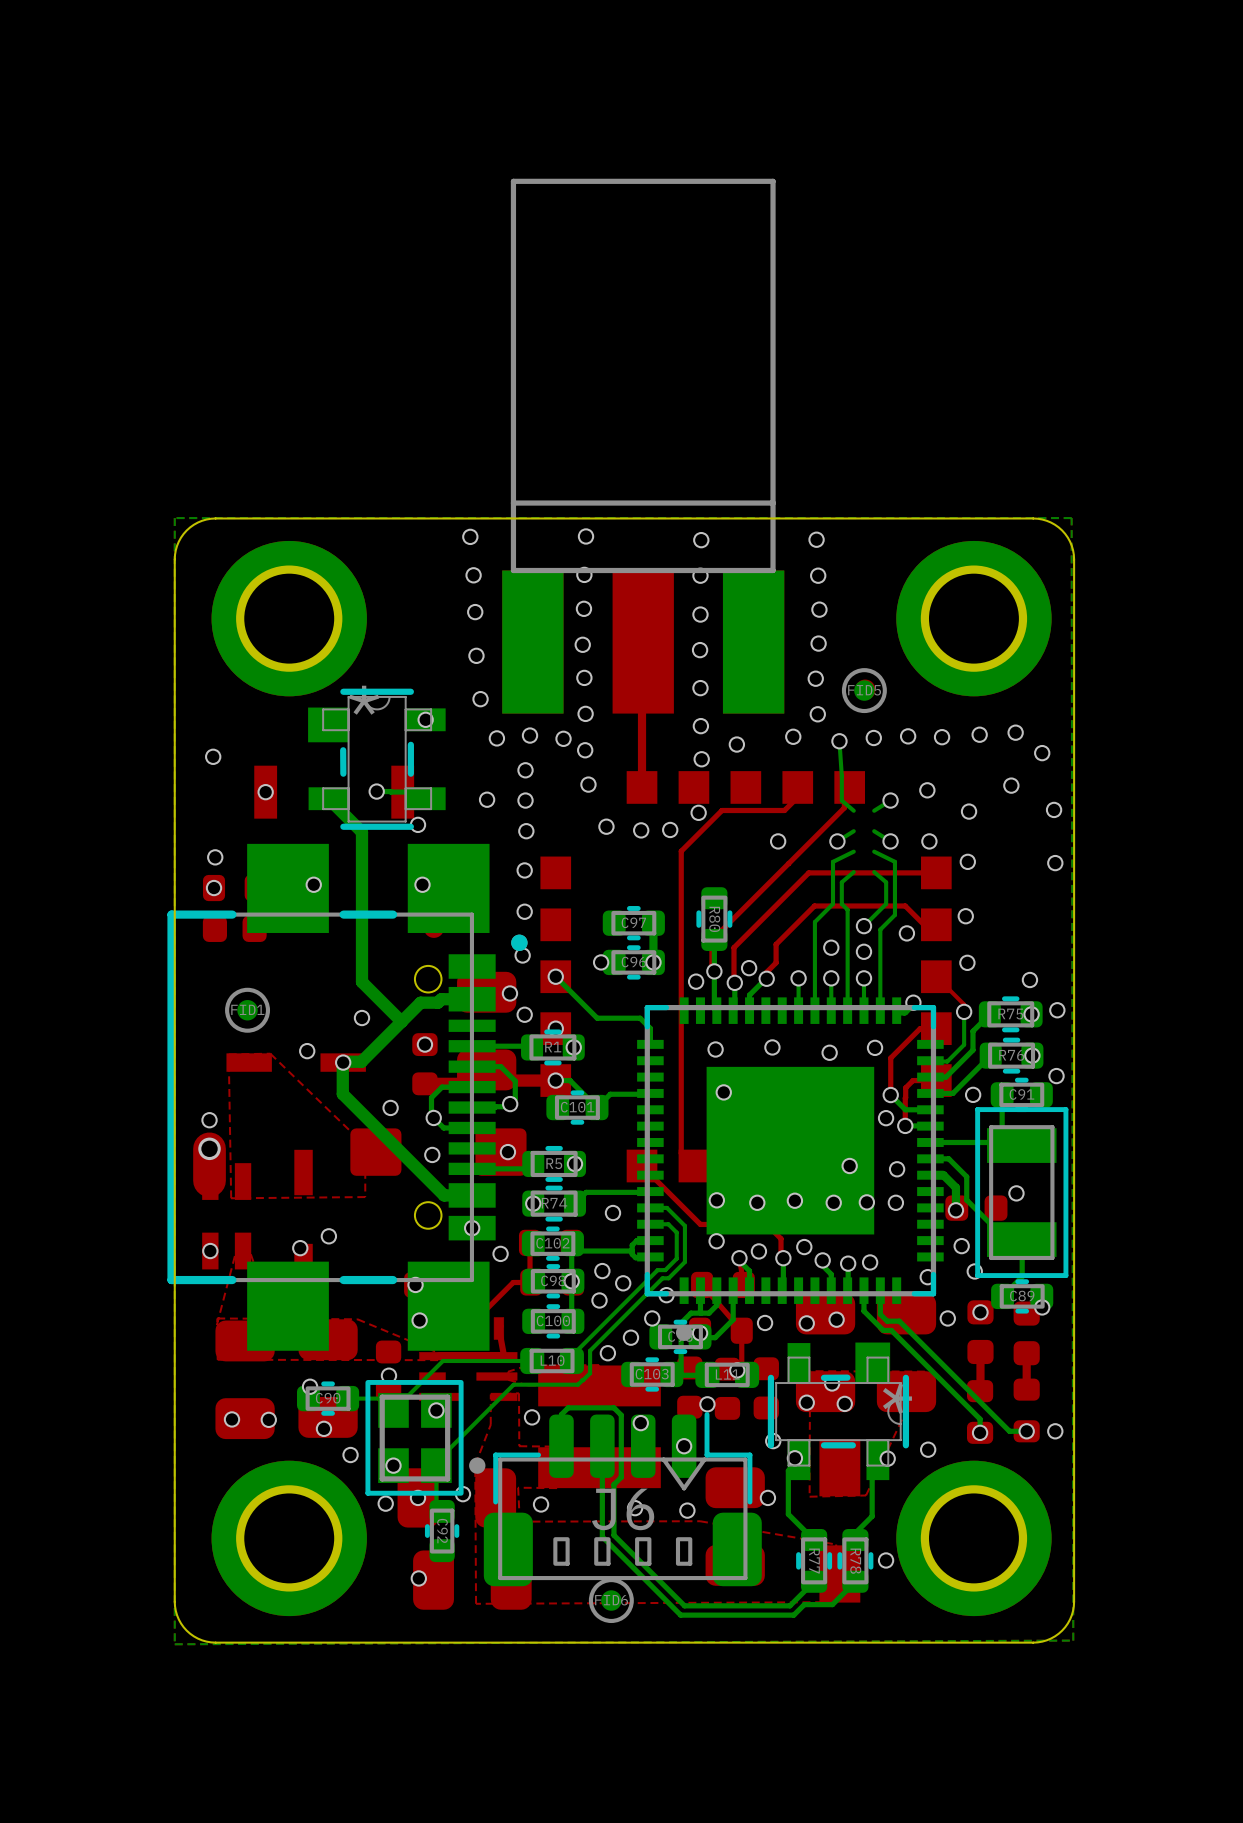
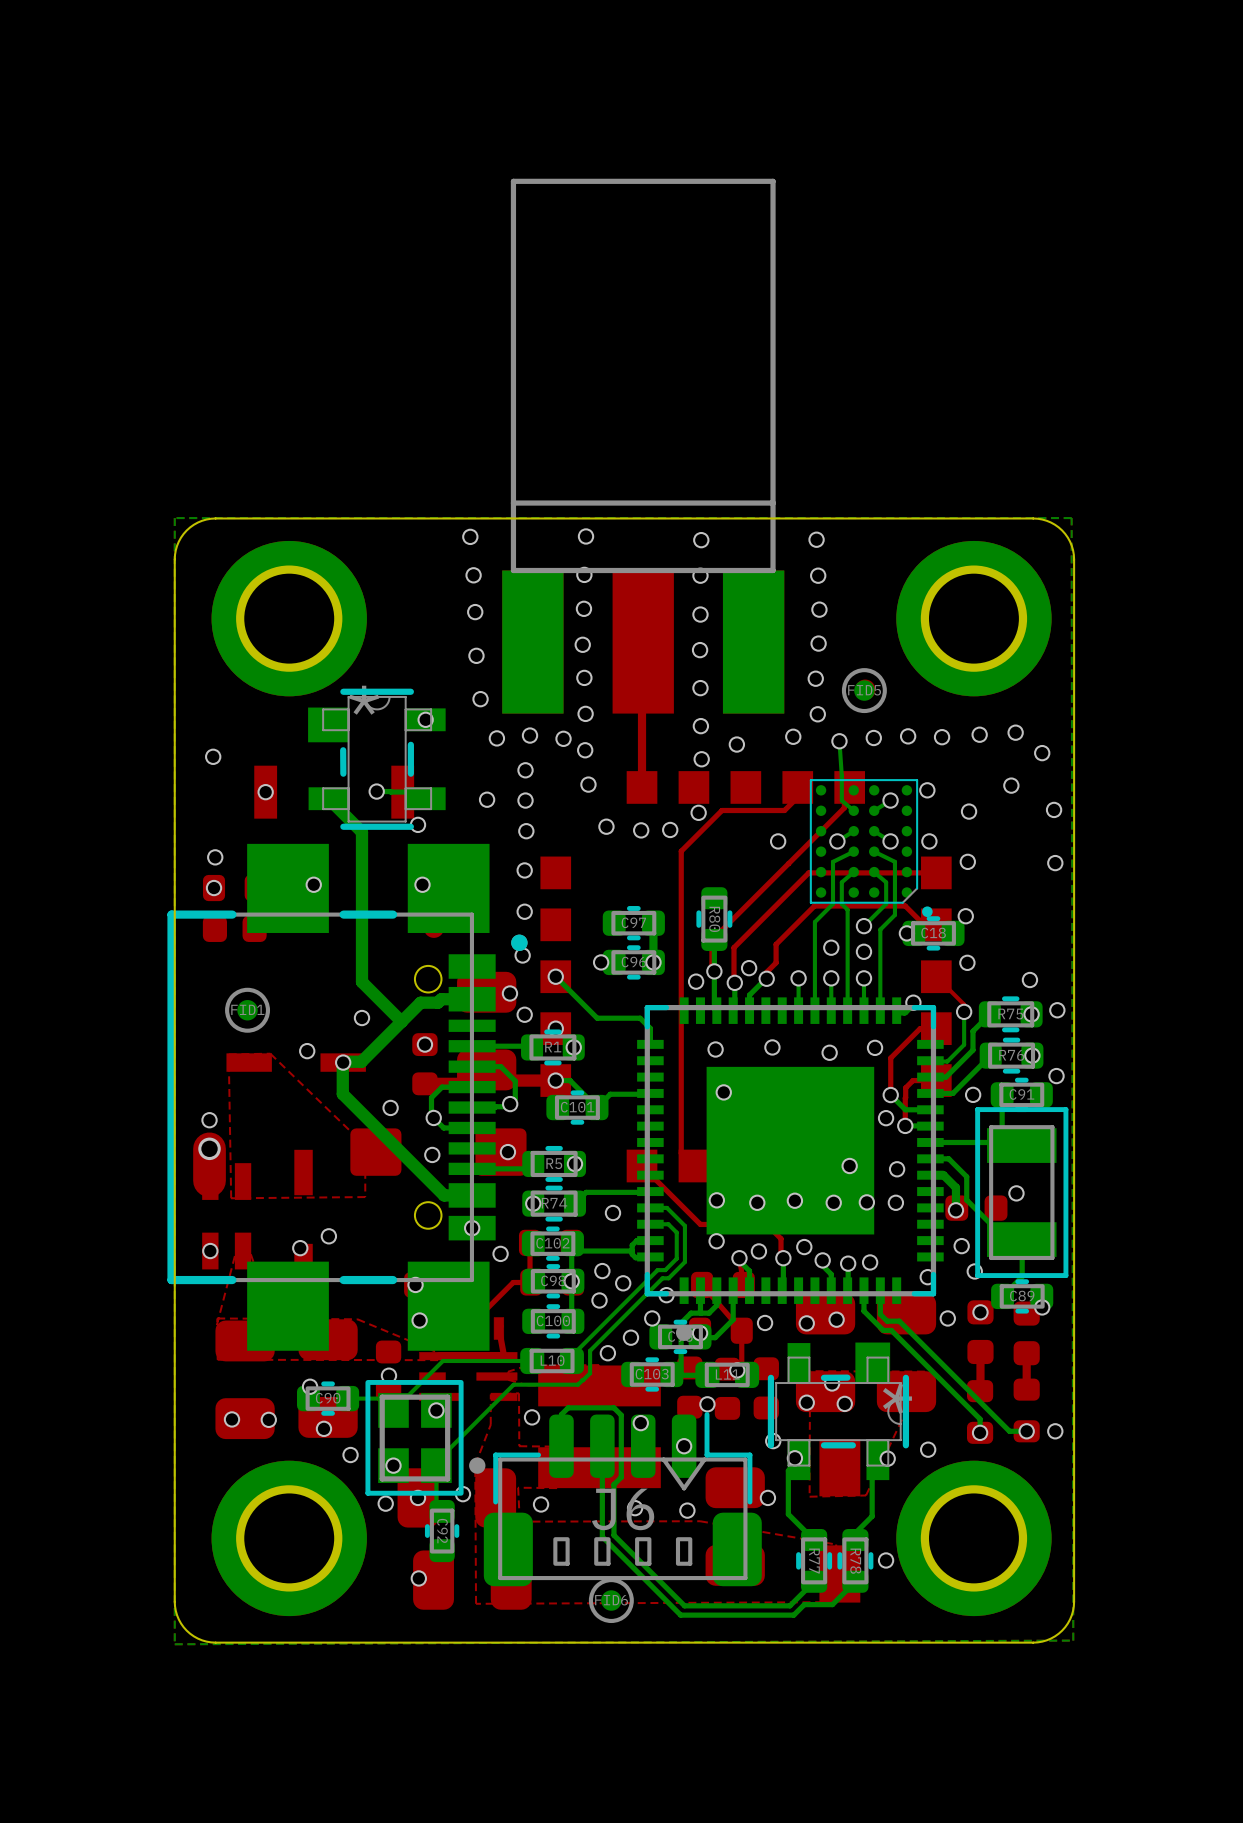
part: none -> (871, 848)
C18: none -> (933, 933)

